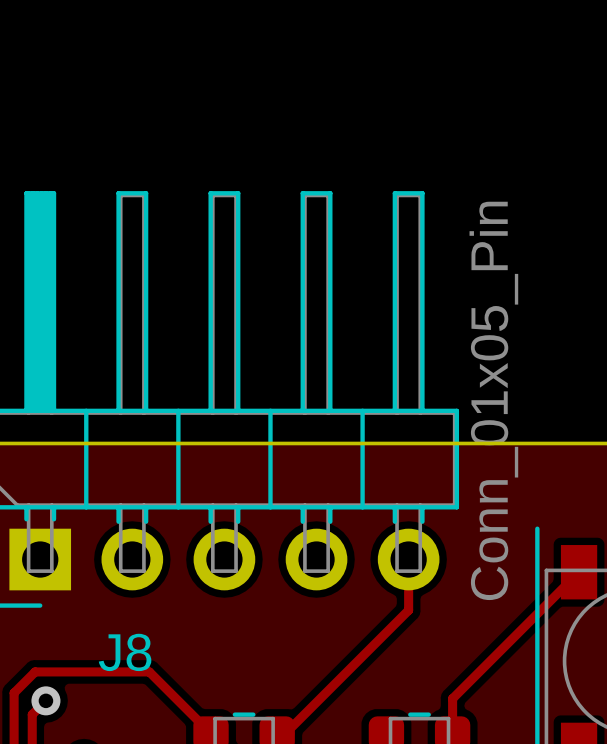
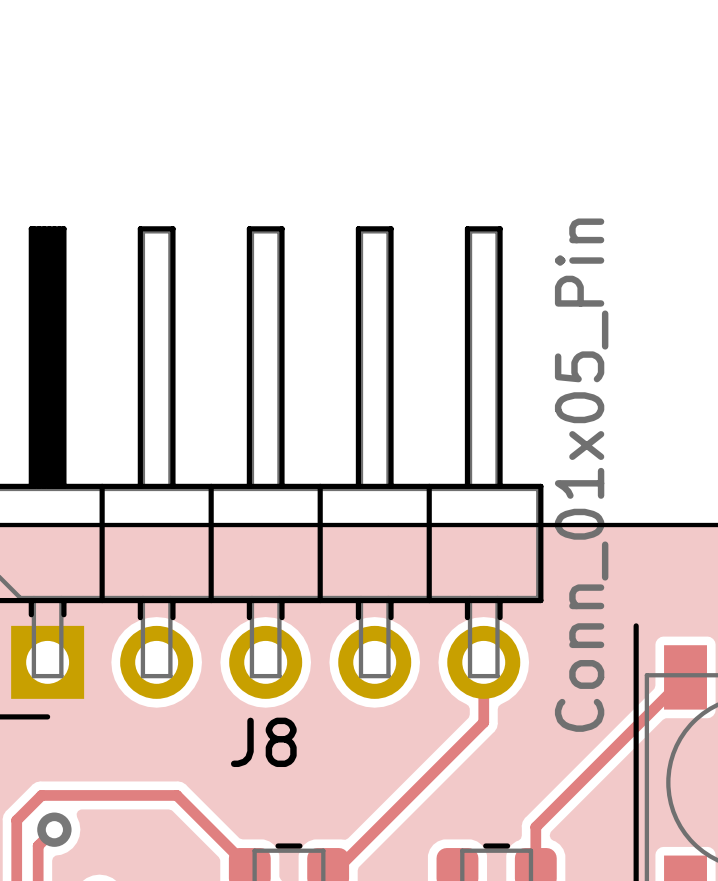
J8 name position: J8 (125, 652) -> J8 (263, 742)

